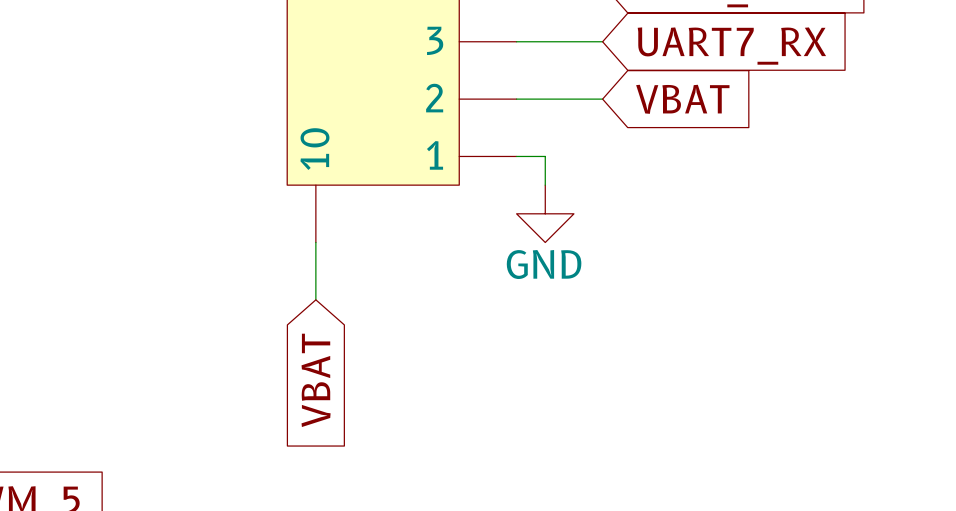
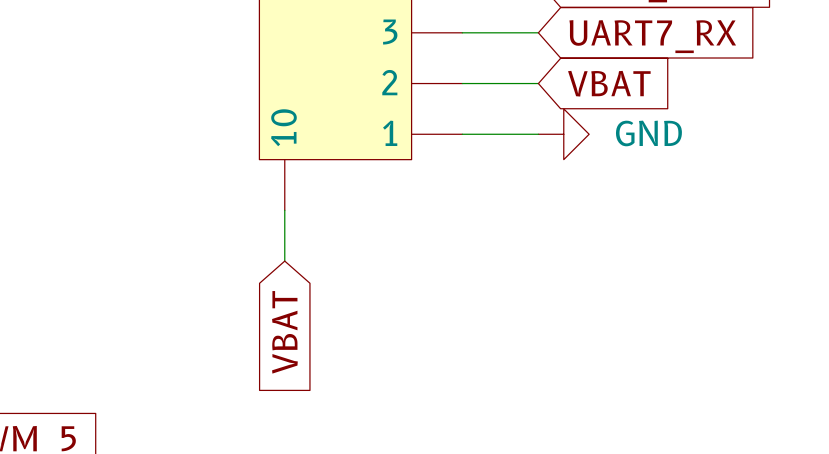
wire: (545, 156) (545, 185) -> (487, 134) (538, 134)
power symbol rotation: 0° (545, 213) -> 90° counterclockwise (563, 134)
power symbol position: GND (545, 213) -> GND (563, 134)
power symbol text position: GND (544, 264) -> GND (648, 133)

